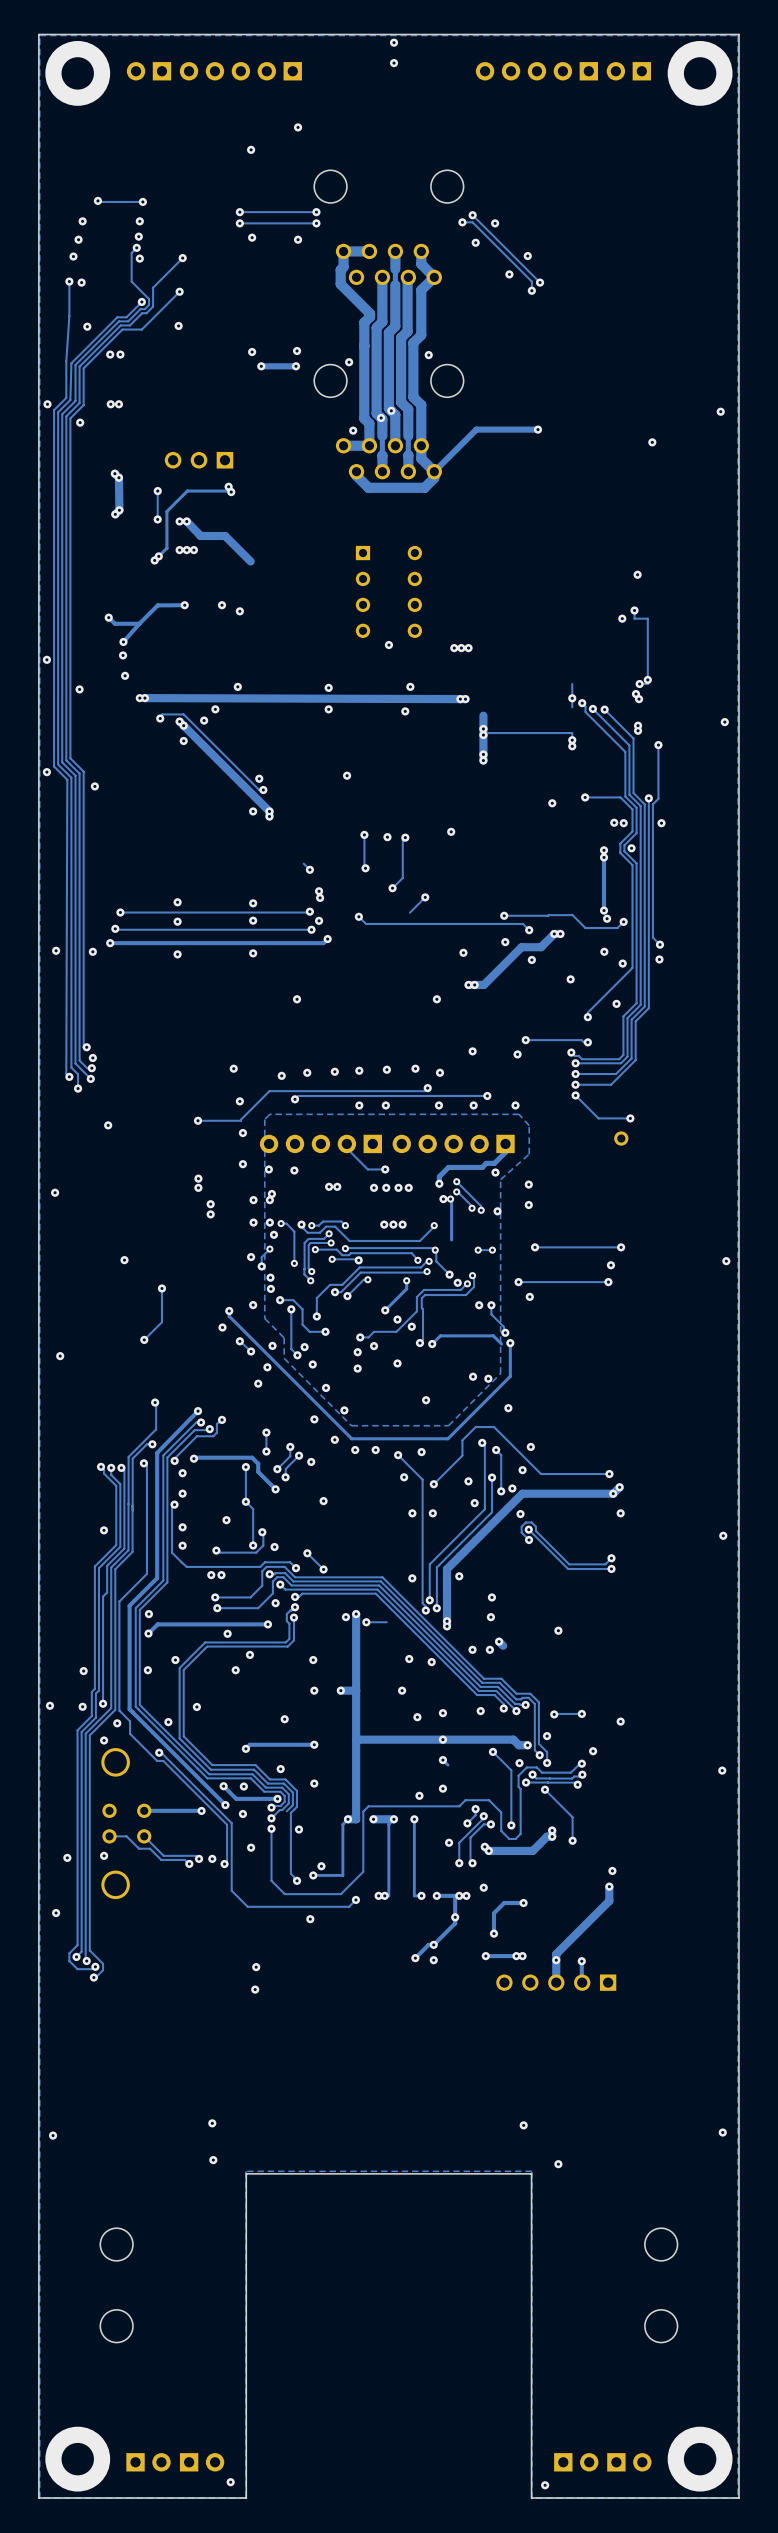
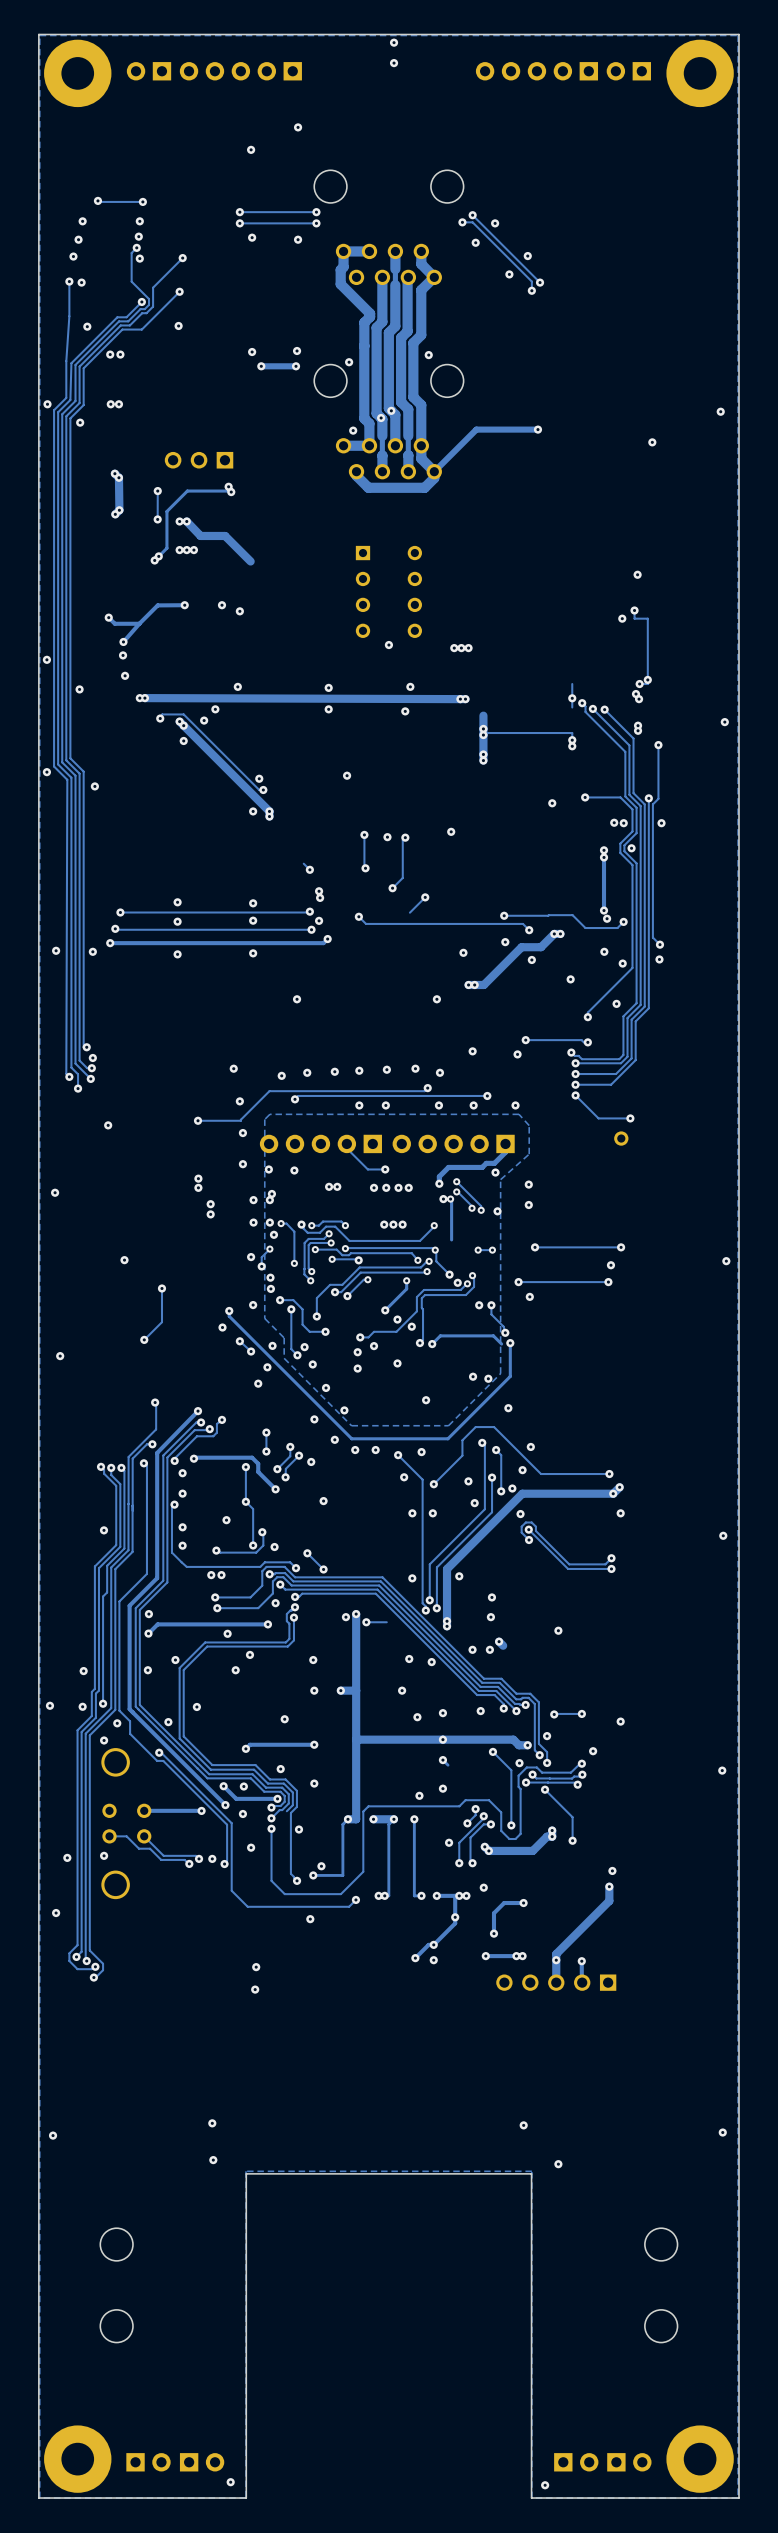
via: (77, 73) -> none
via: (700, 73) -> none
part: none -> (388, 1266)
via: (77, 2459) -> none
via: (700, 2459) -> none

